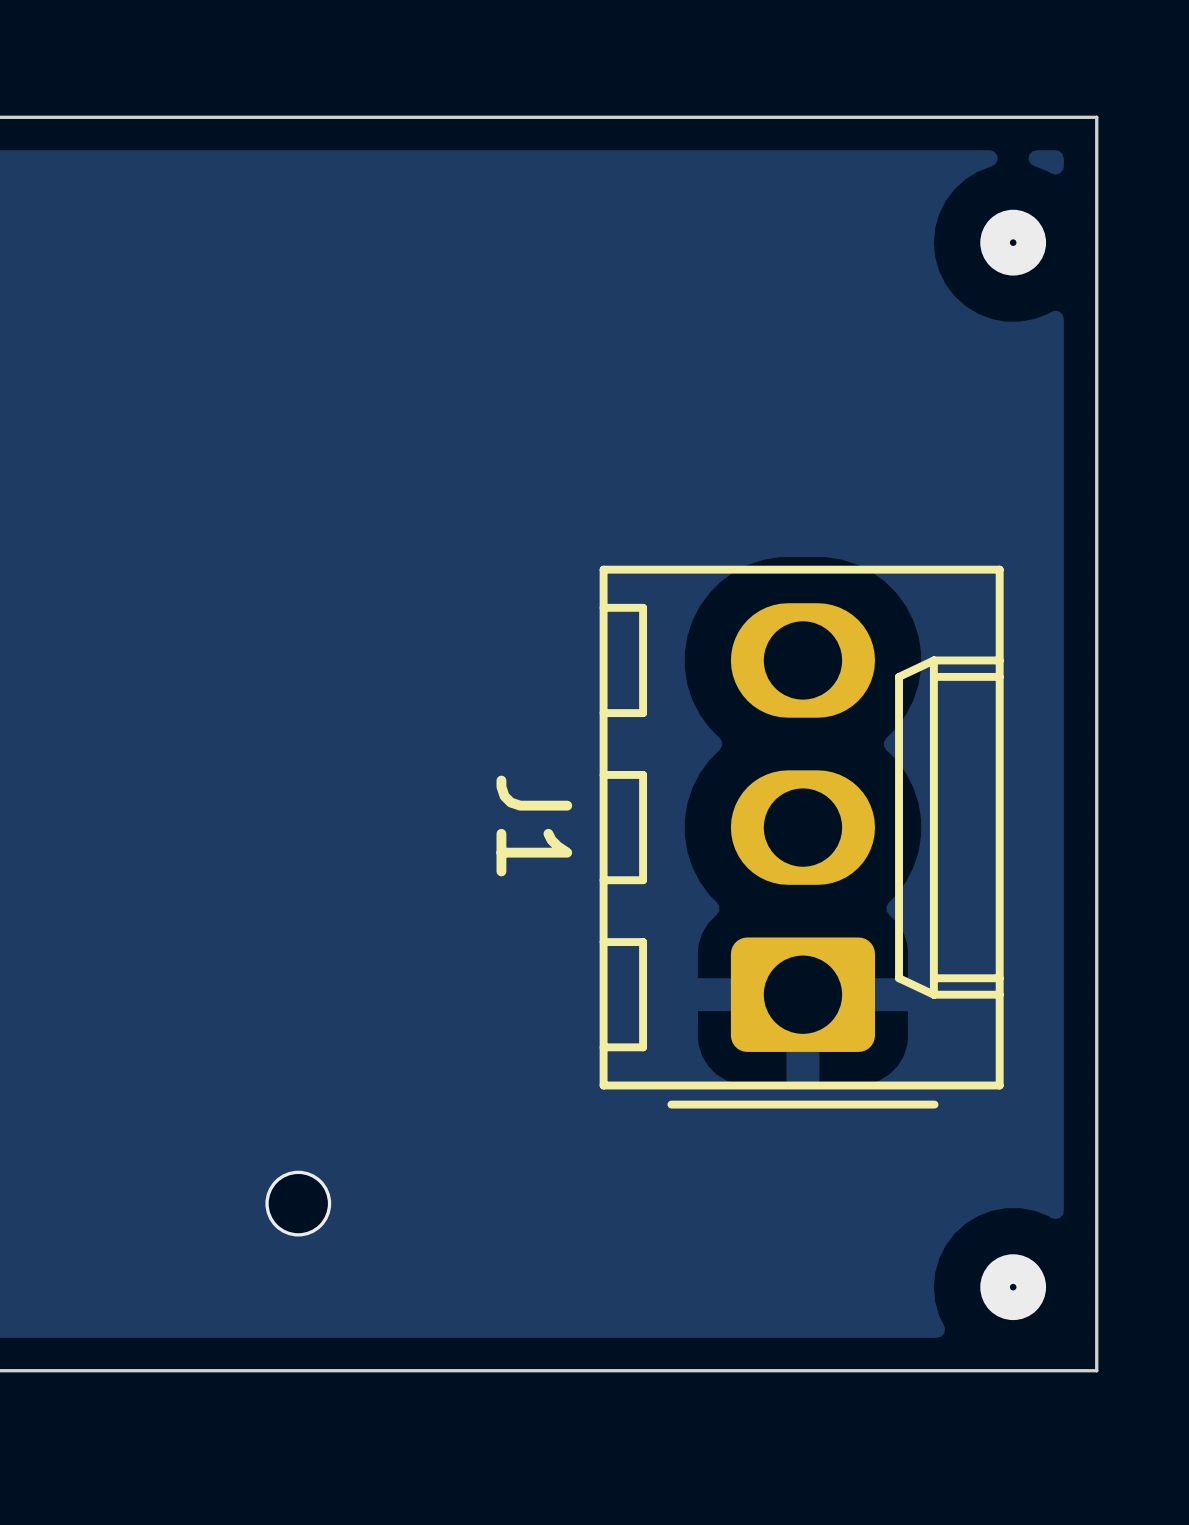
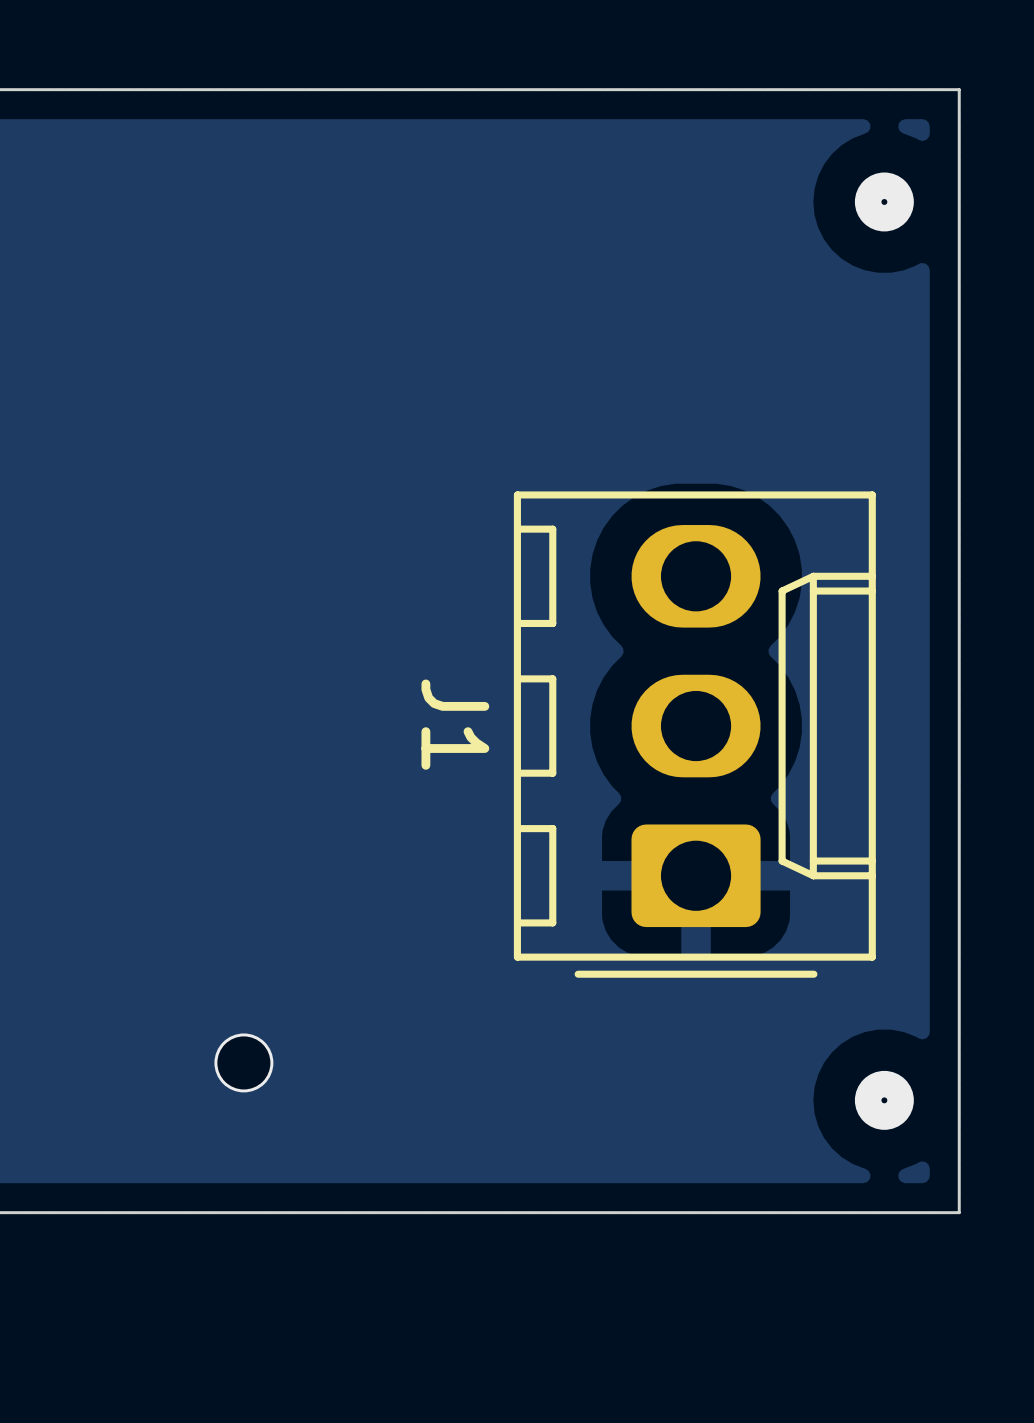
via position: (1013, 1287) -> (884, 1100)

